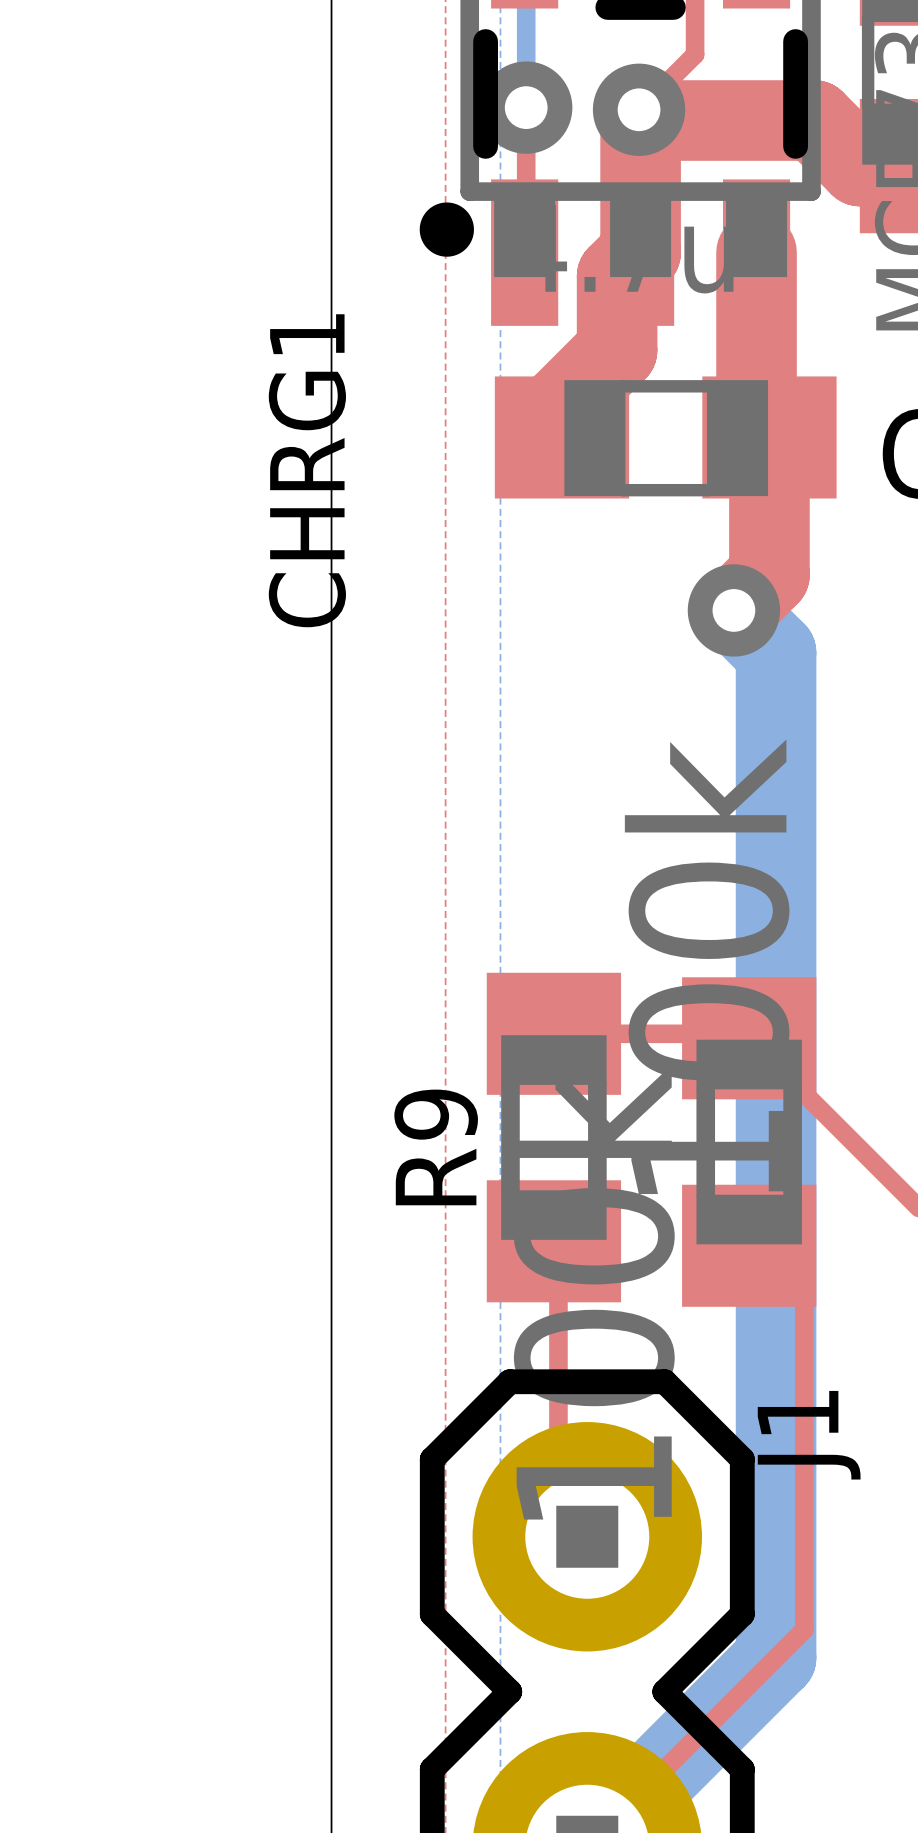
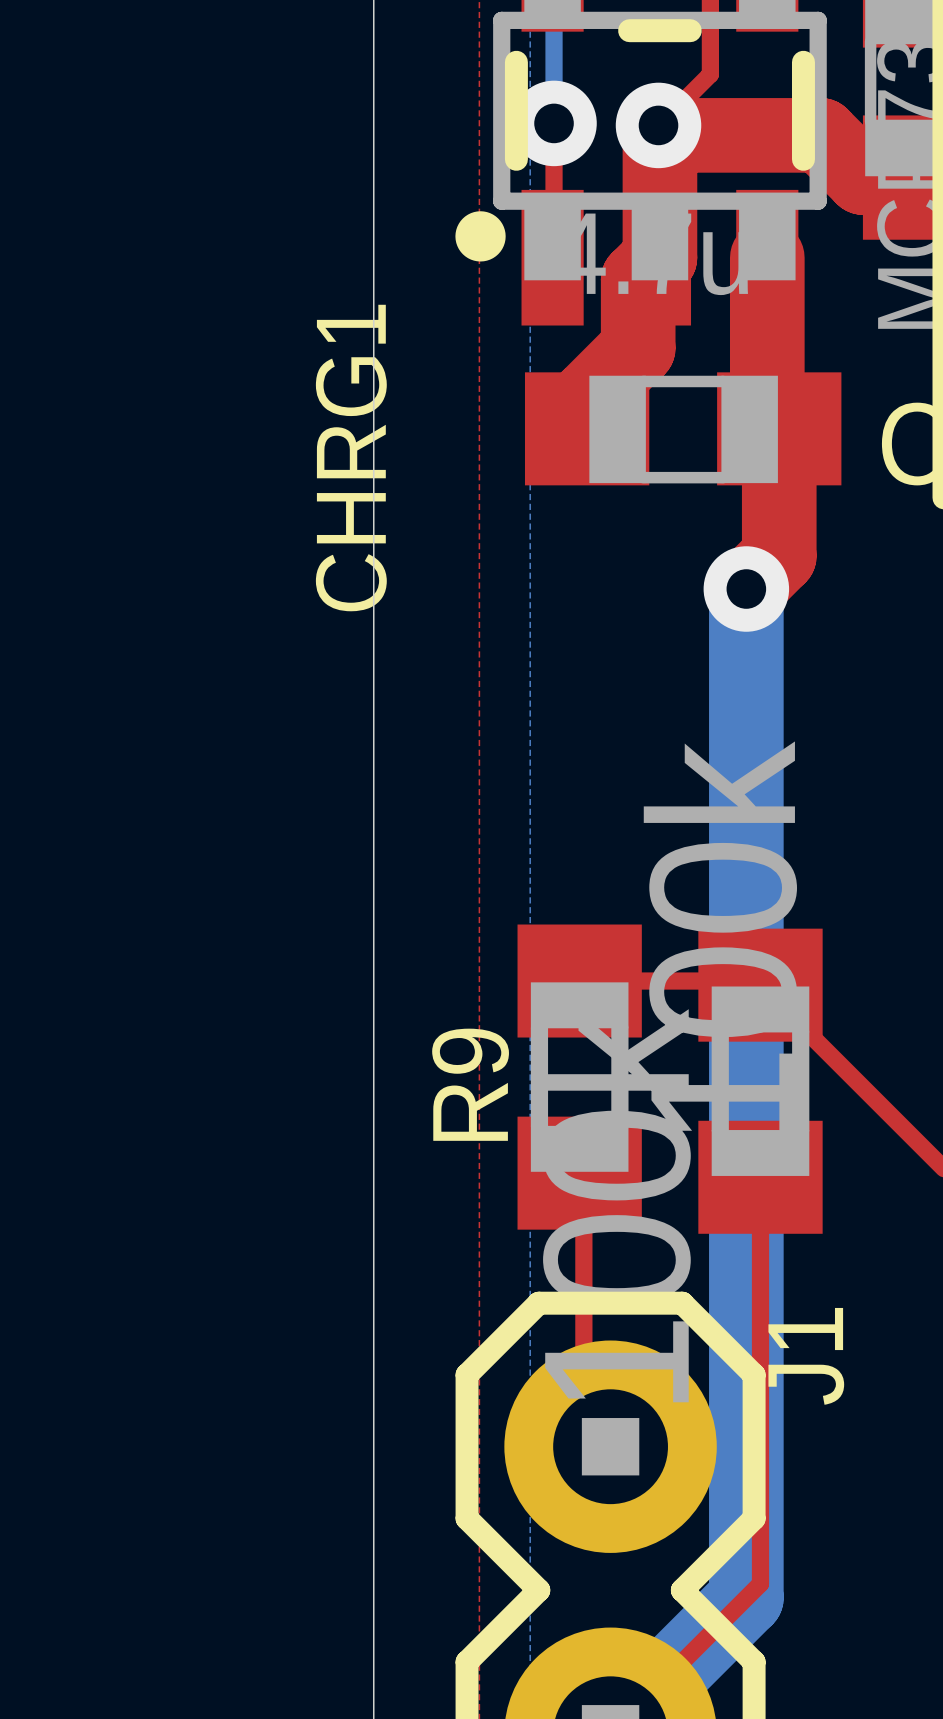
bottom track: (733, 610) (776, 652) (776, 1657) (733, 1700) -> (746, 589) (746, 1597)
top track: (749, 1245) (804, 1300) (804, 1629) (749, 1684) -> (760, 1177) (760, 1583)

